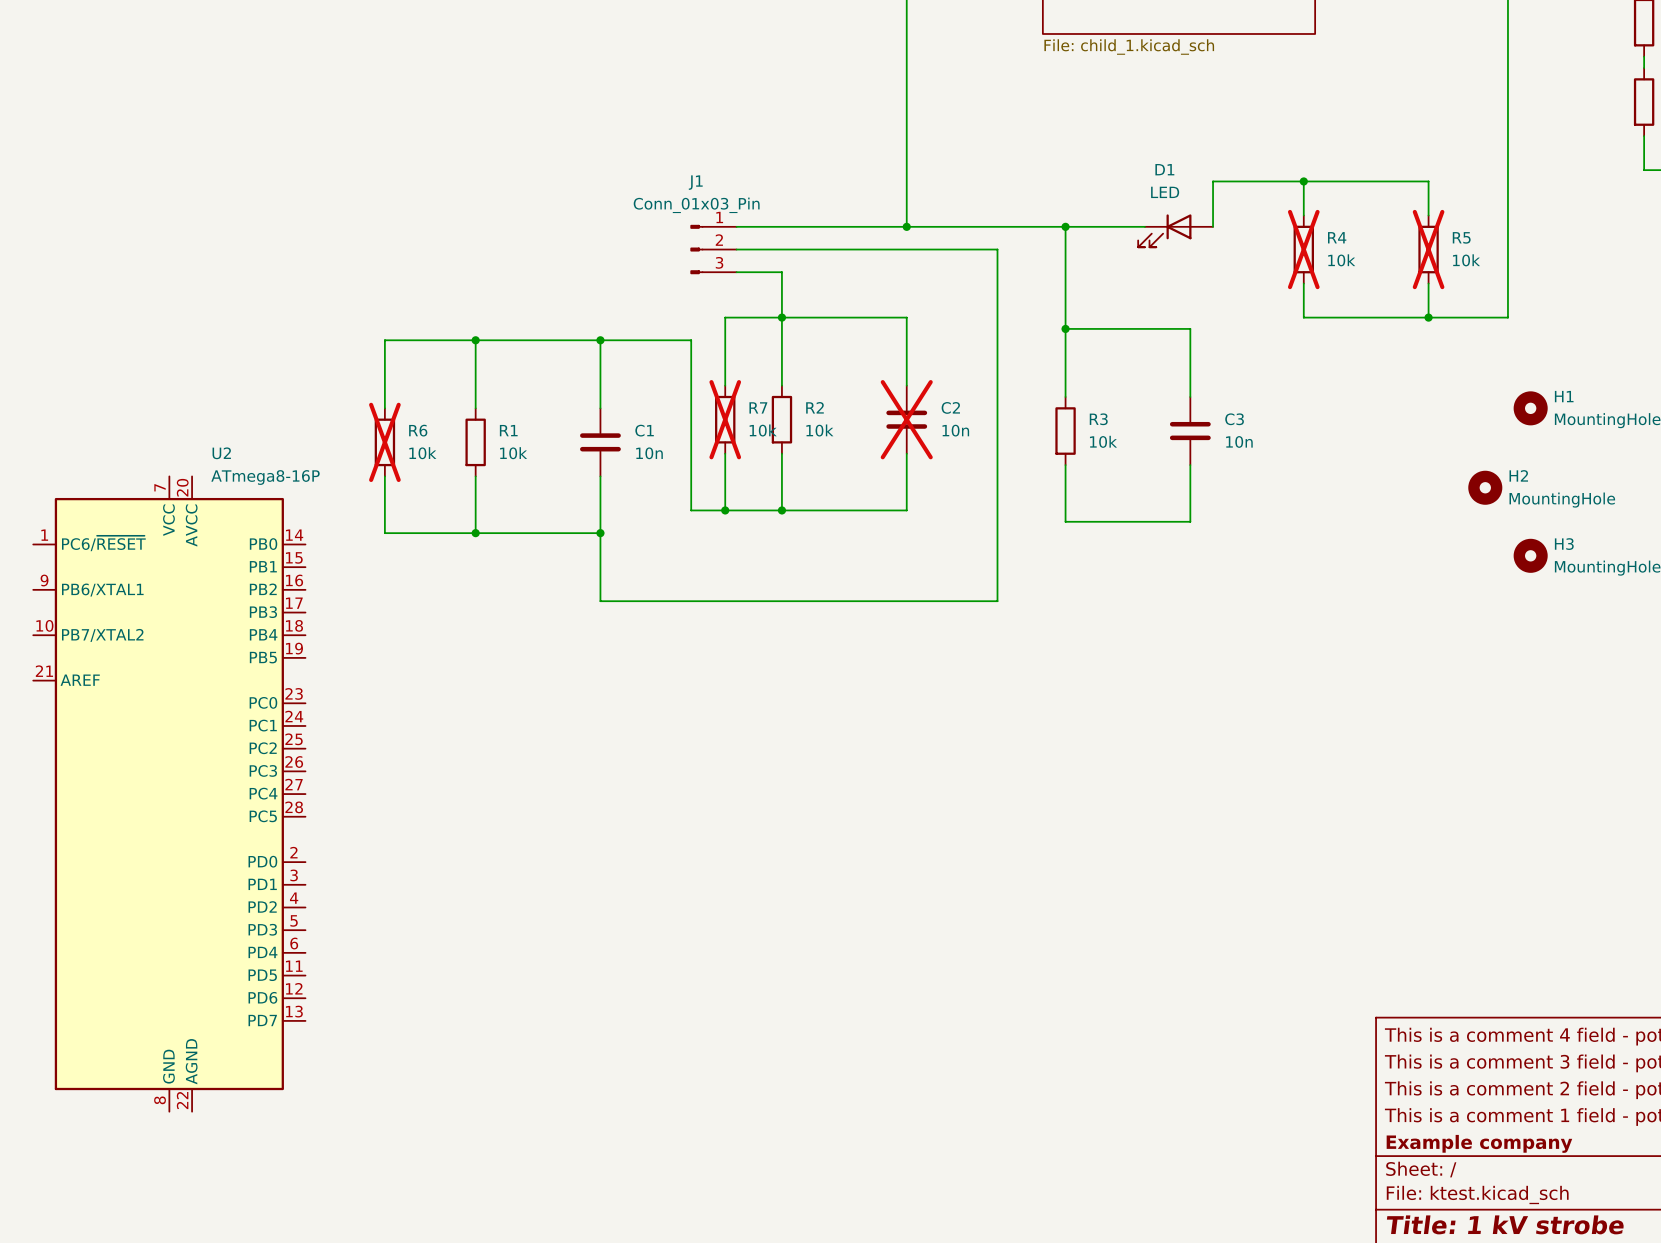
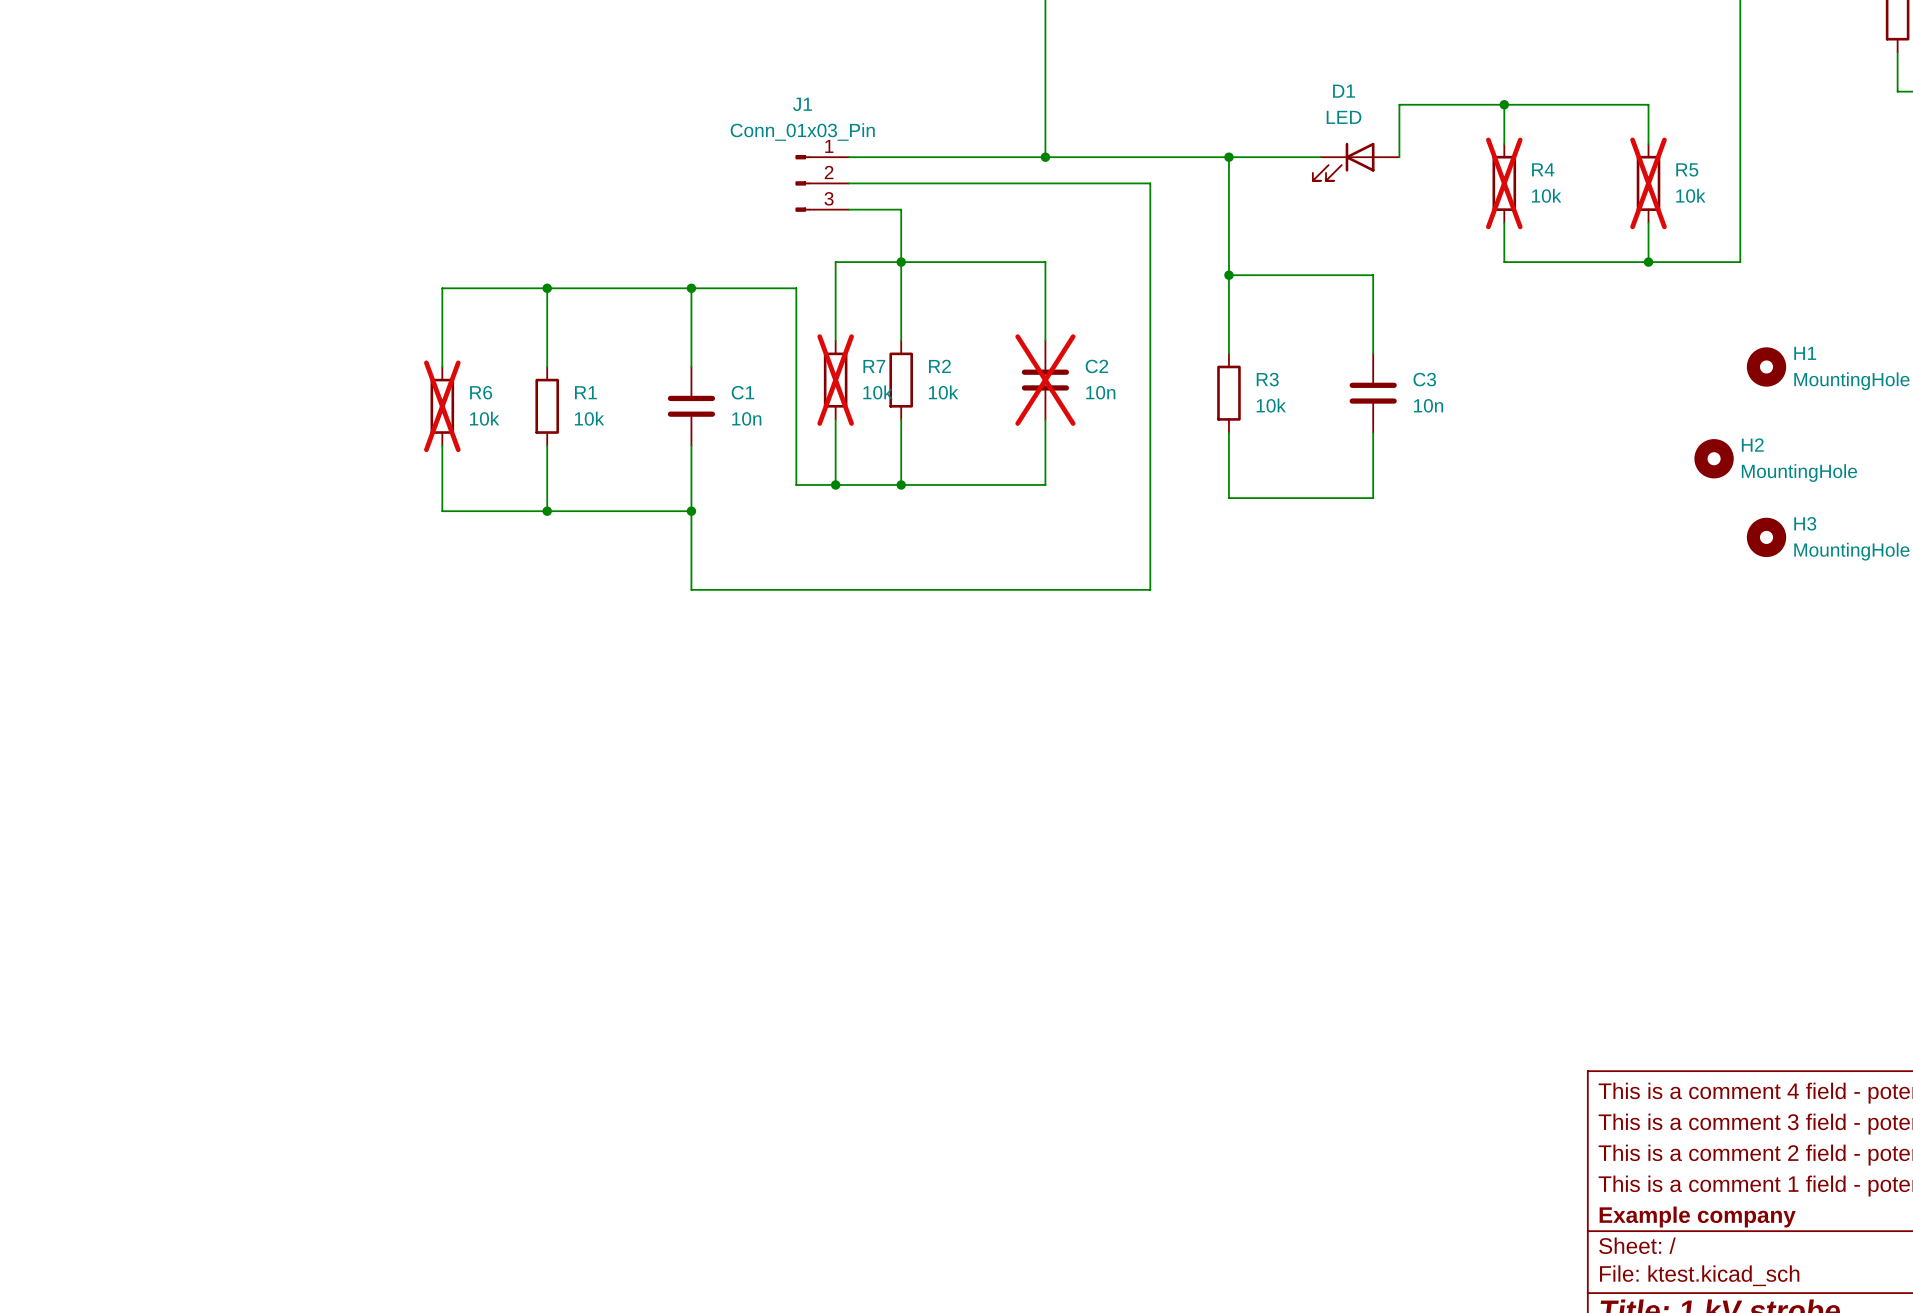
U2: ATmega8-16P (169, 794) -> none

